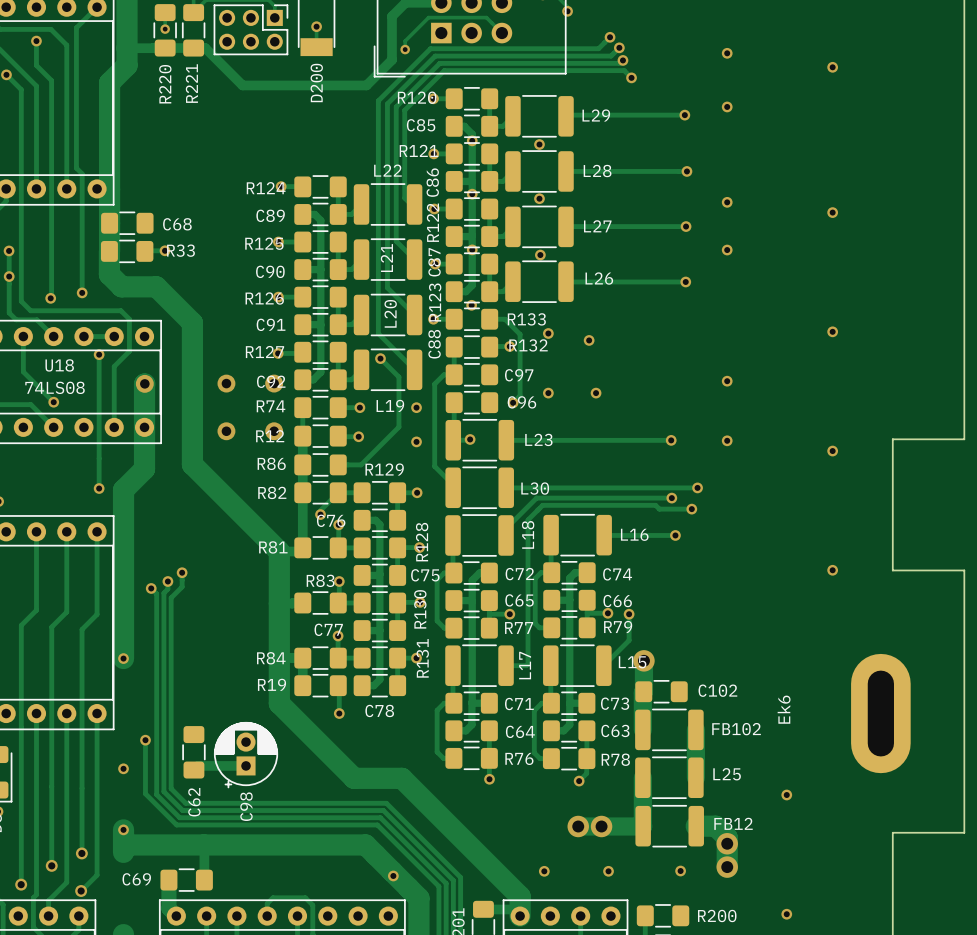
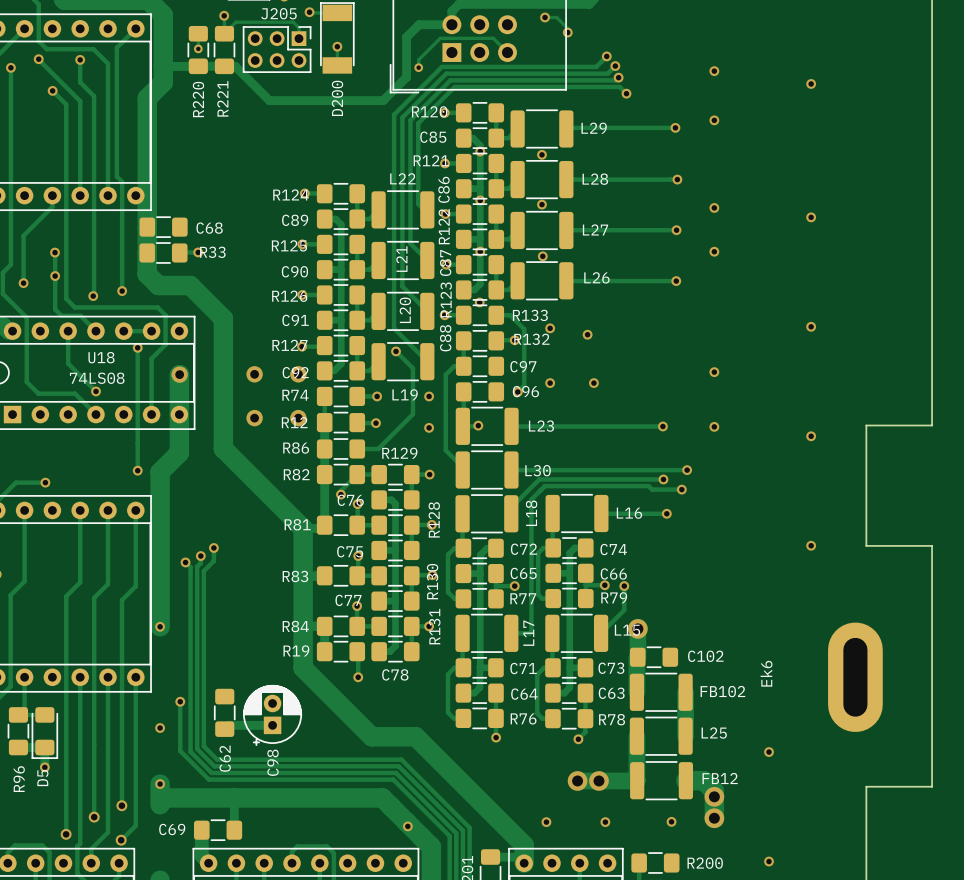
C75 name position: C75 (425, 575) -> C75 (350, 551)
R83 name position: R83 (320, 580) -> R83 (295, 576)

